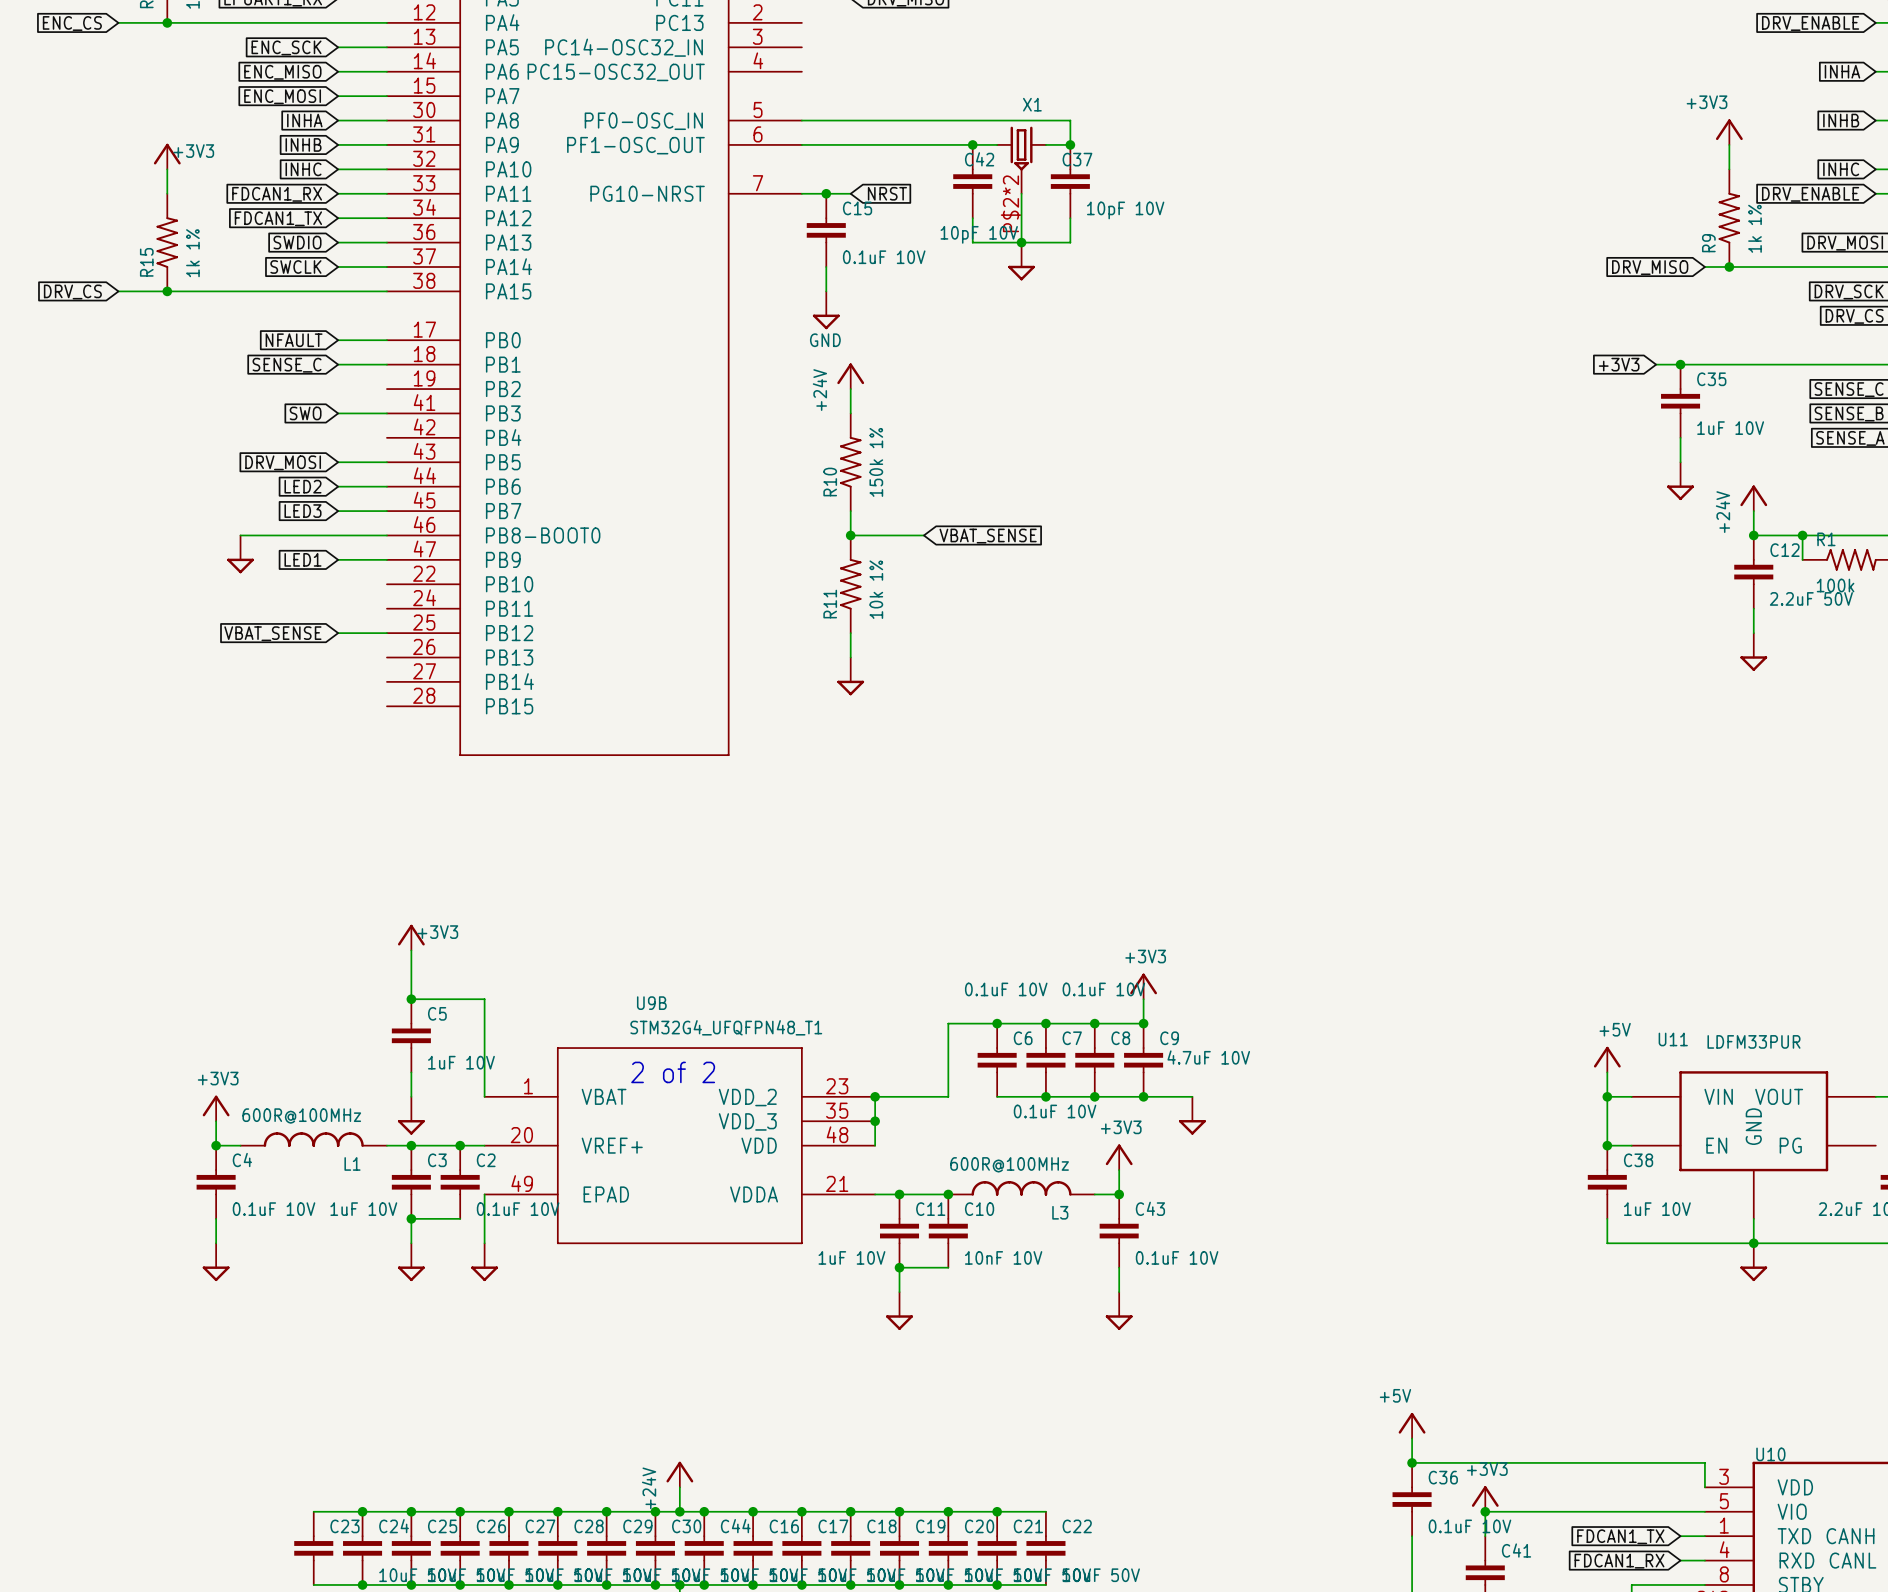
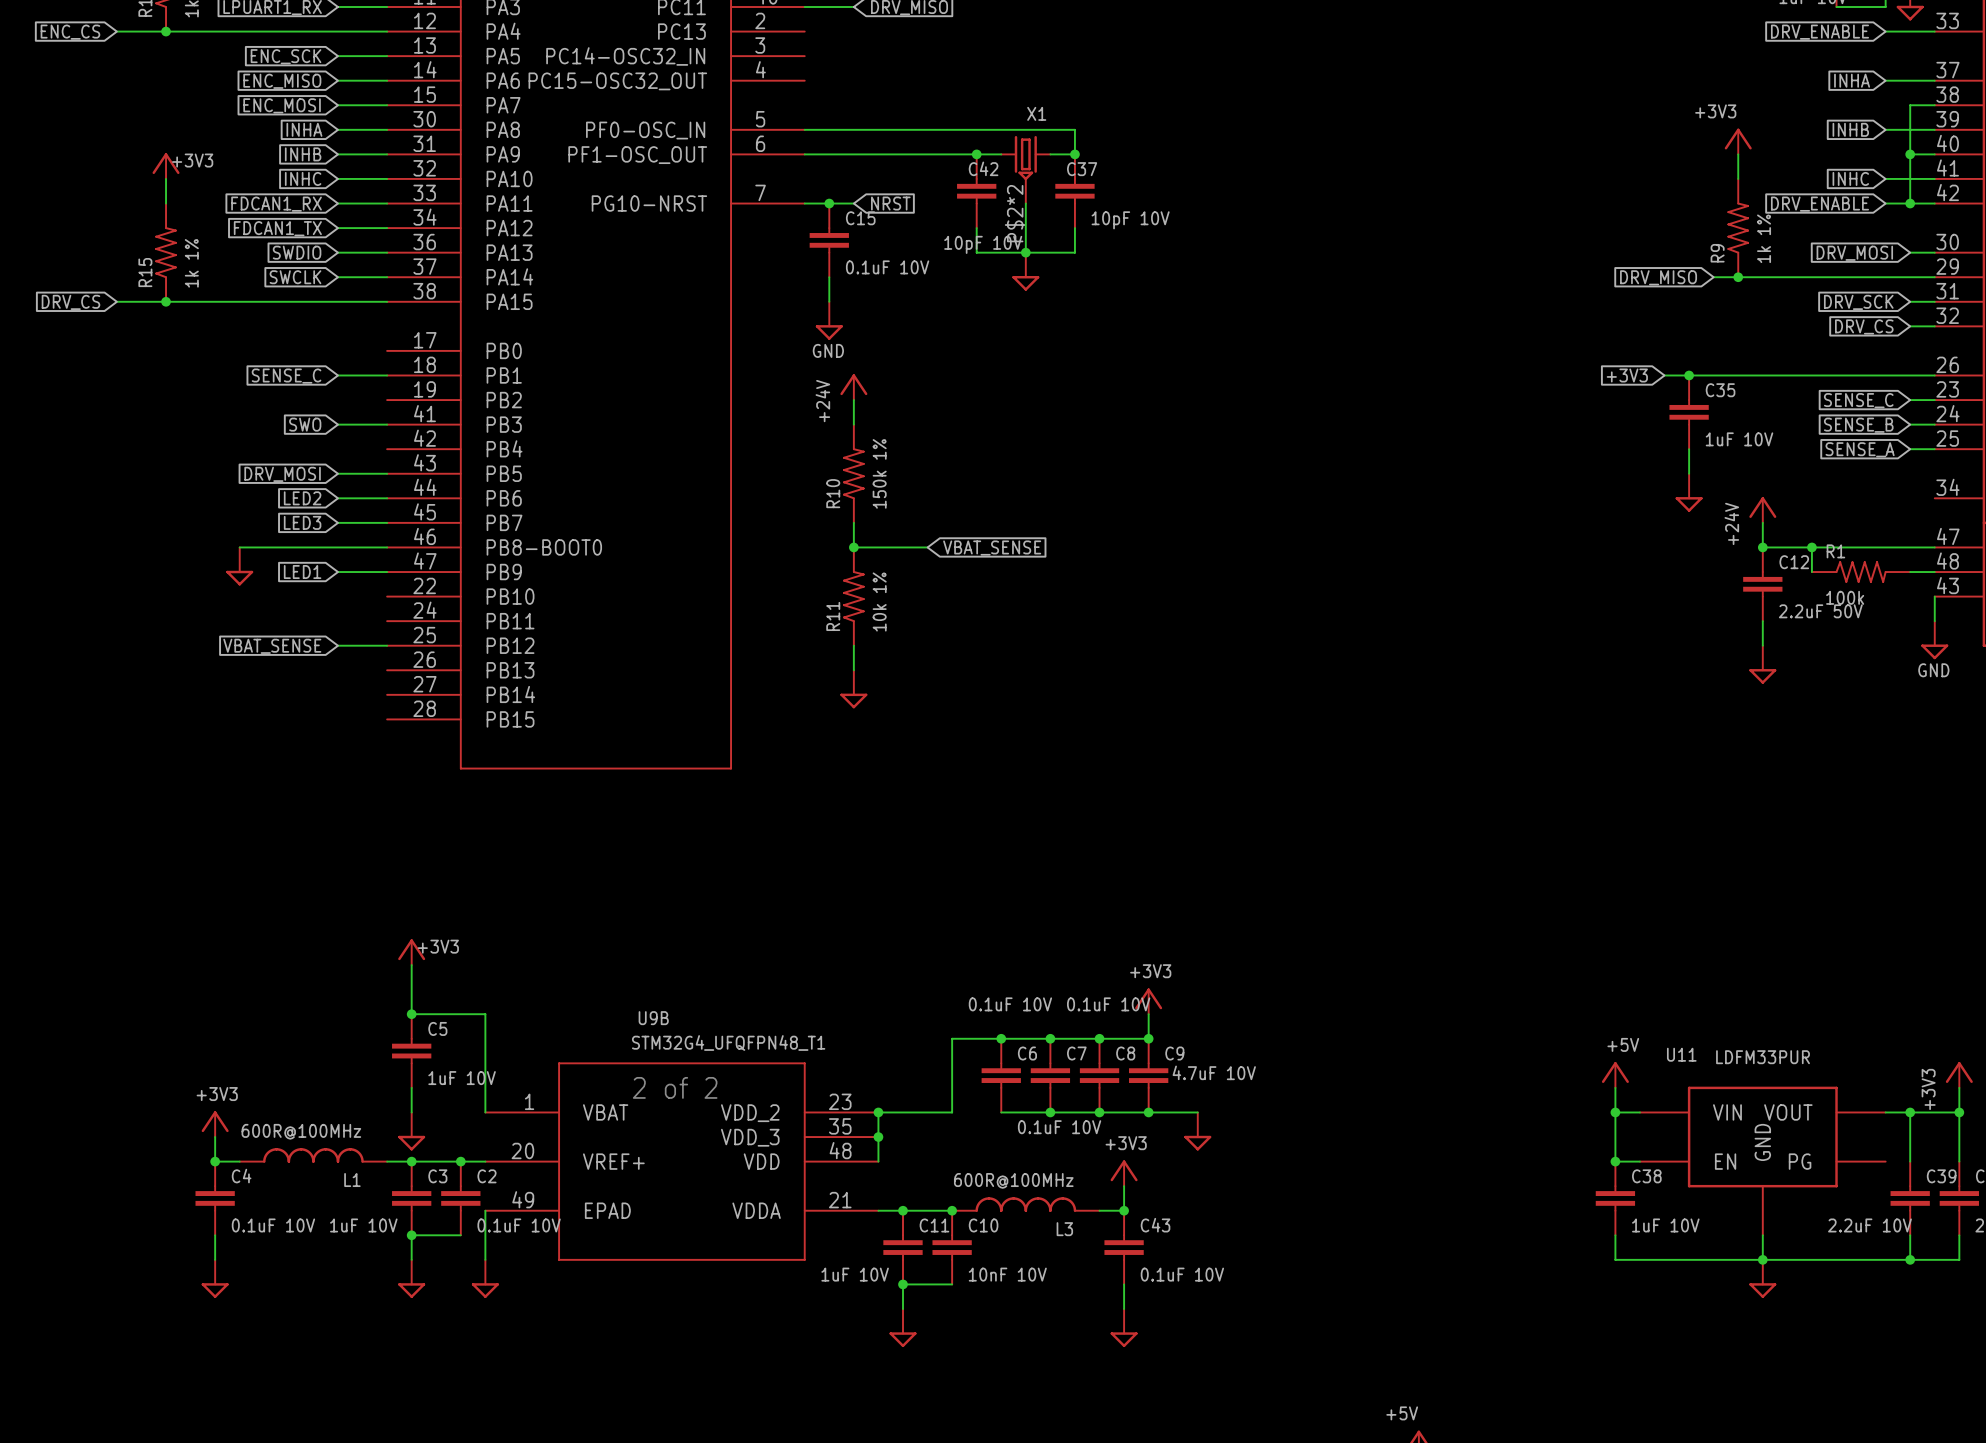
global label: NFAULT (294, 340) -> none
wire: (338, 340) (386, 340) -> none

